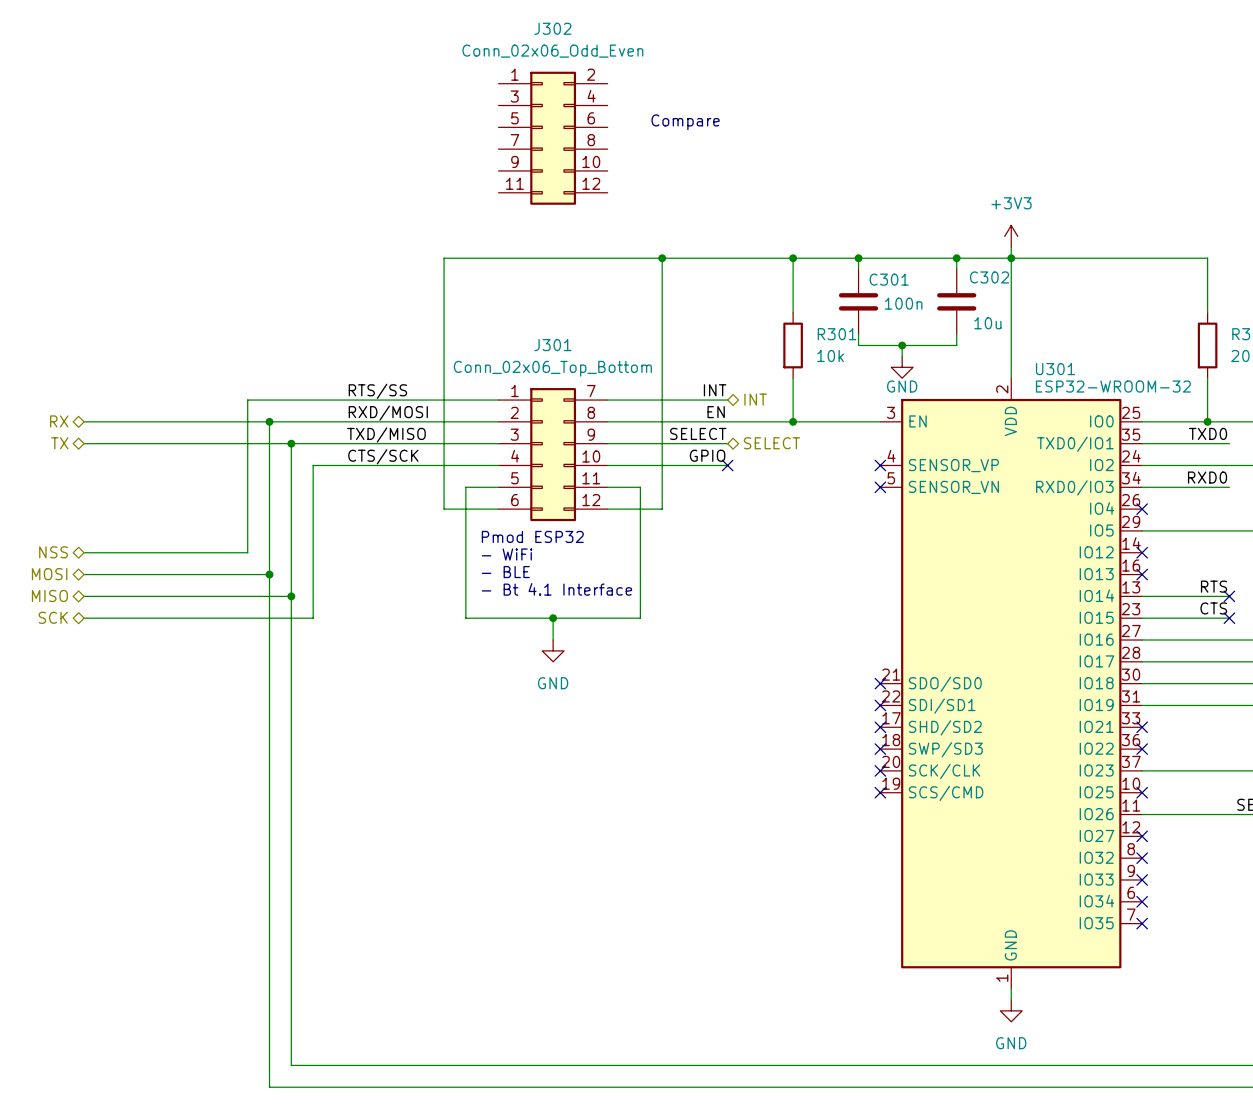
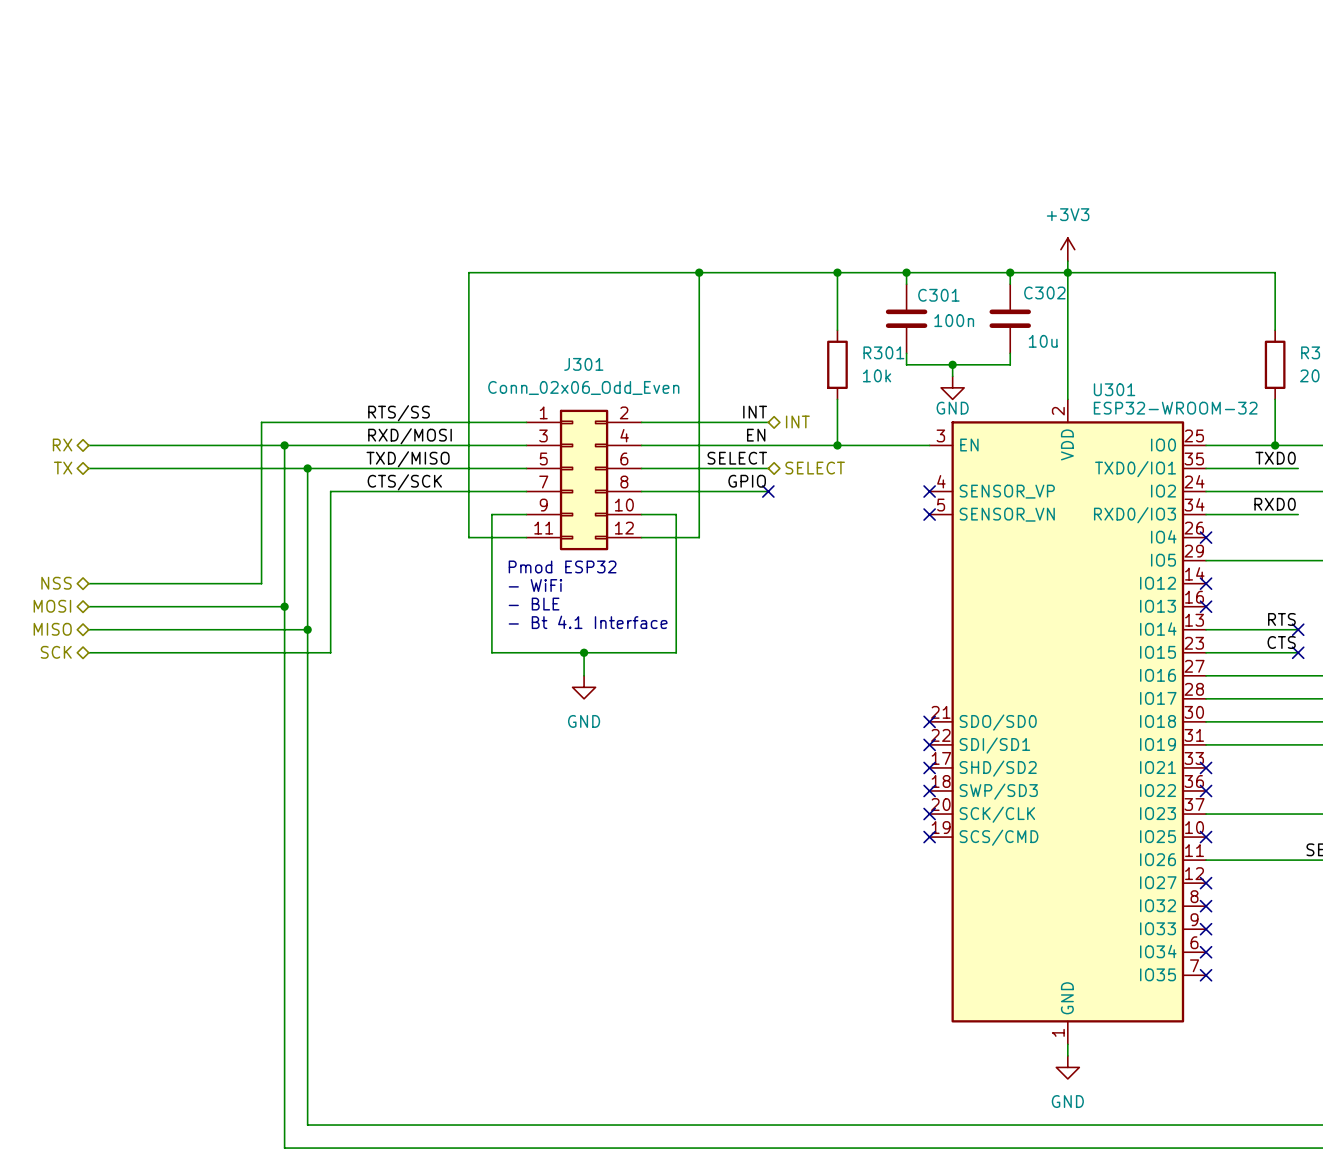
text: Compare (685, 122) -> none
J302: Conn_02x06_Odd_Even (553, 138) -> none
J301 value: Conn_02x06_Top_Bottom (552, 368) -> Conn_02x06_Odd_Even (583, 387)
J301 symbol: [498, 388, 608, 522] -> [526, 409, 642, 551]

